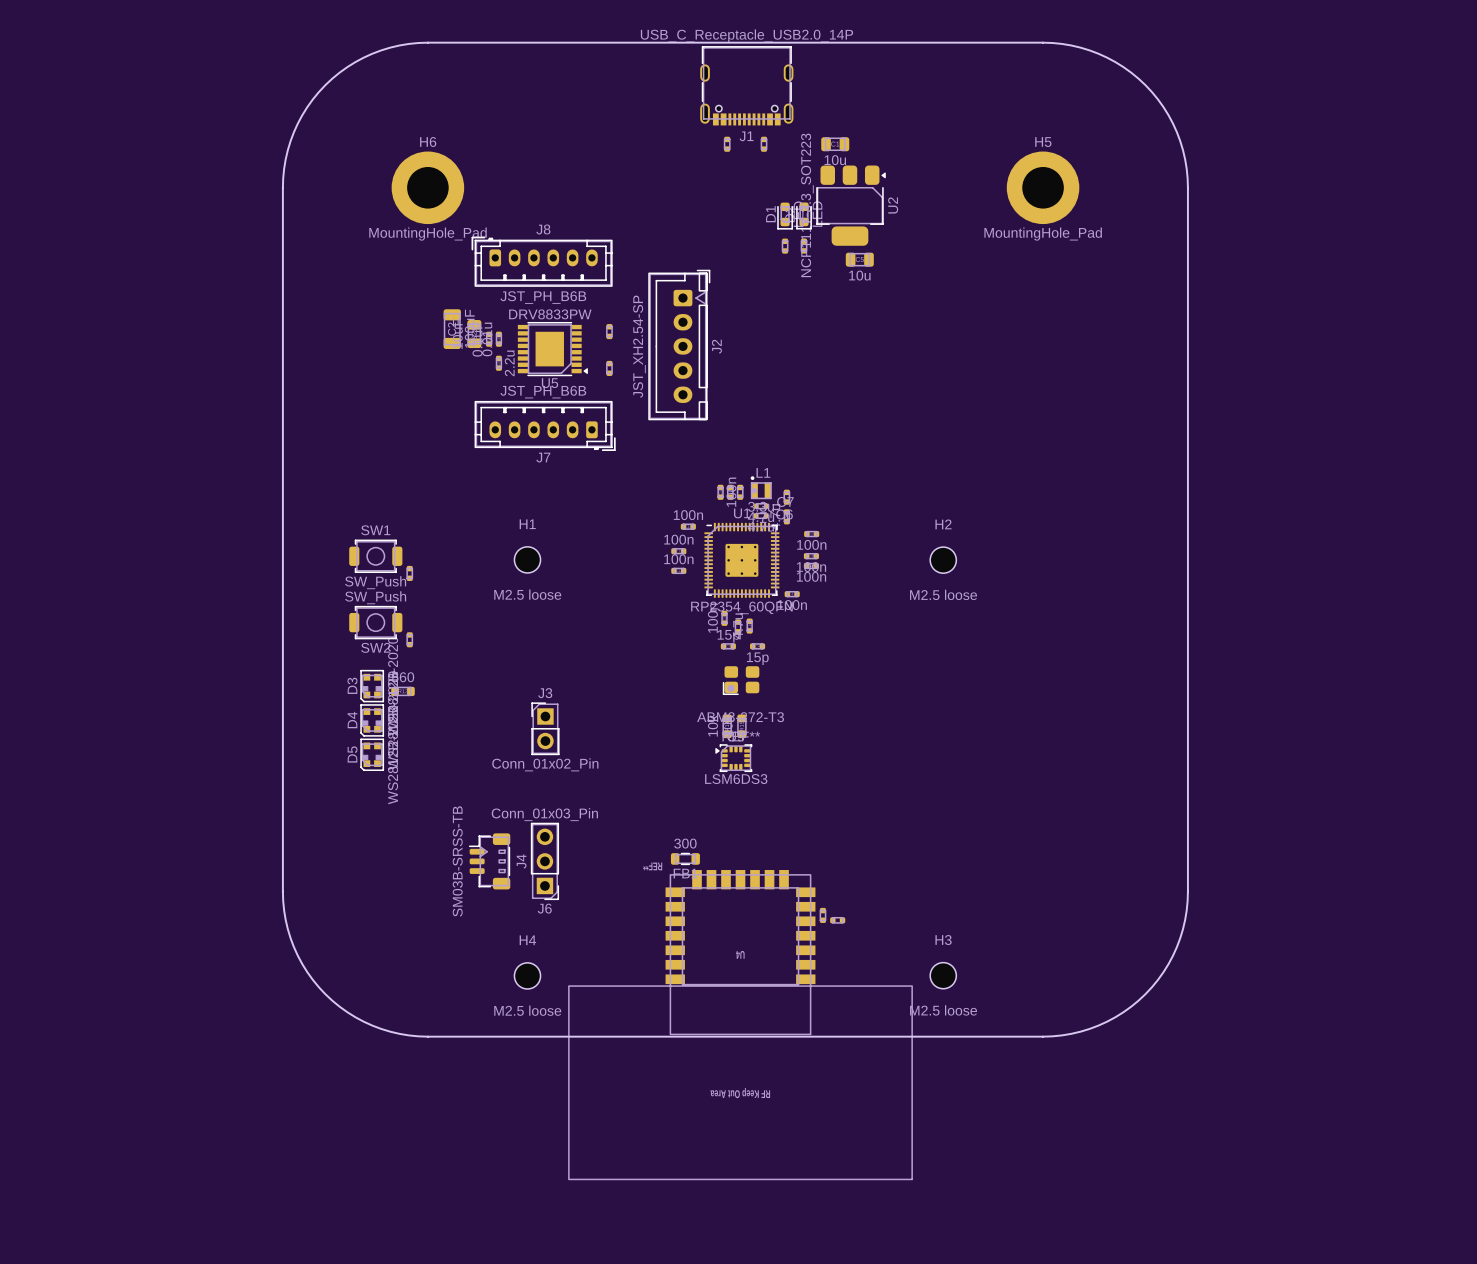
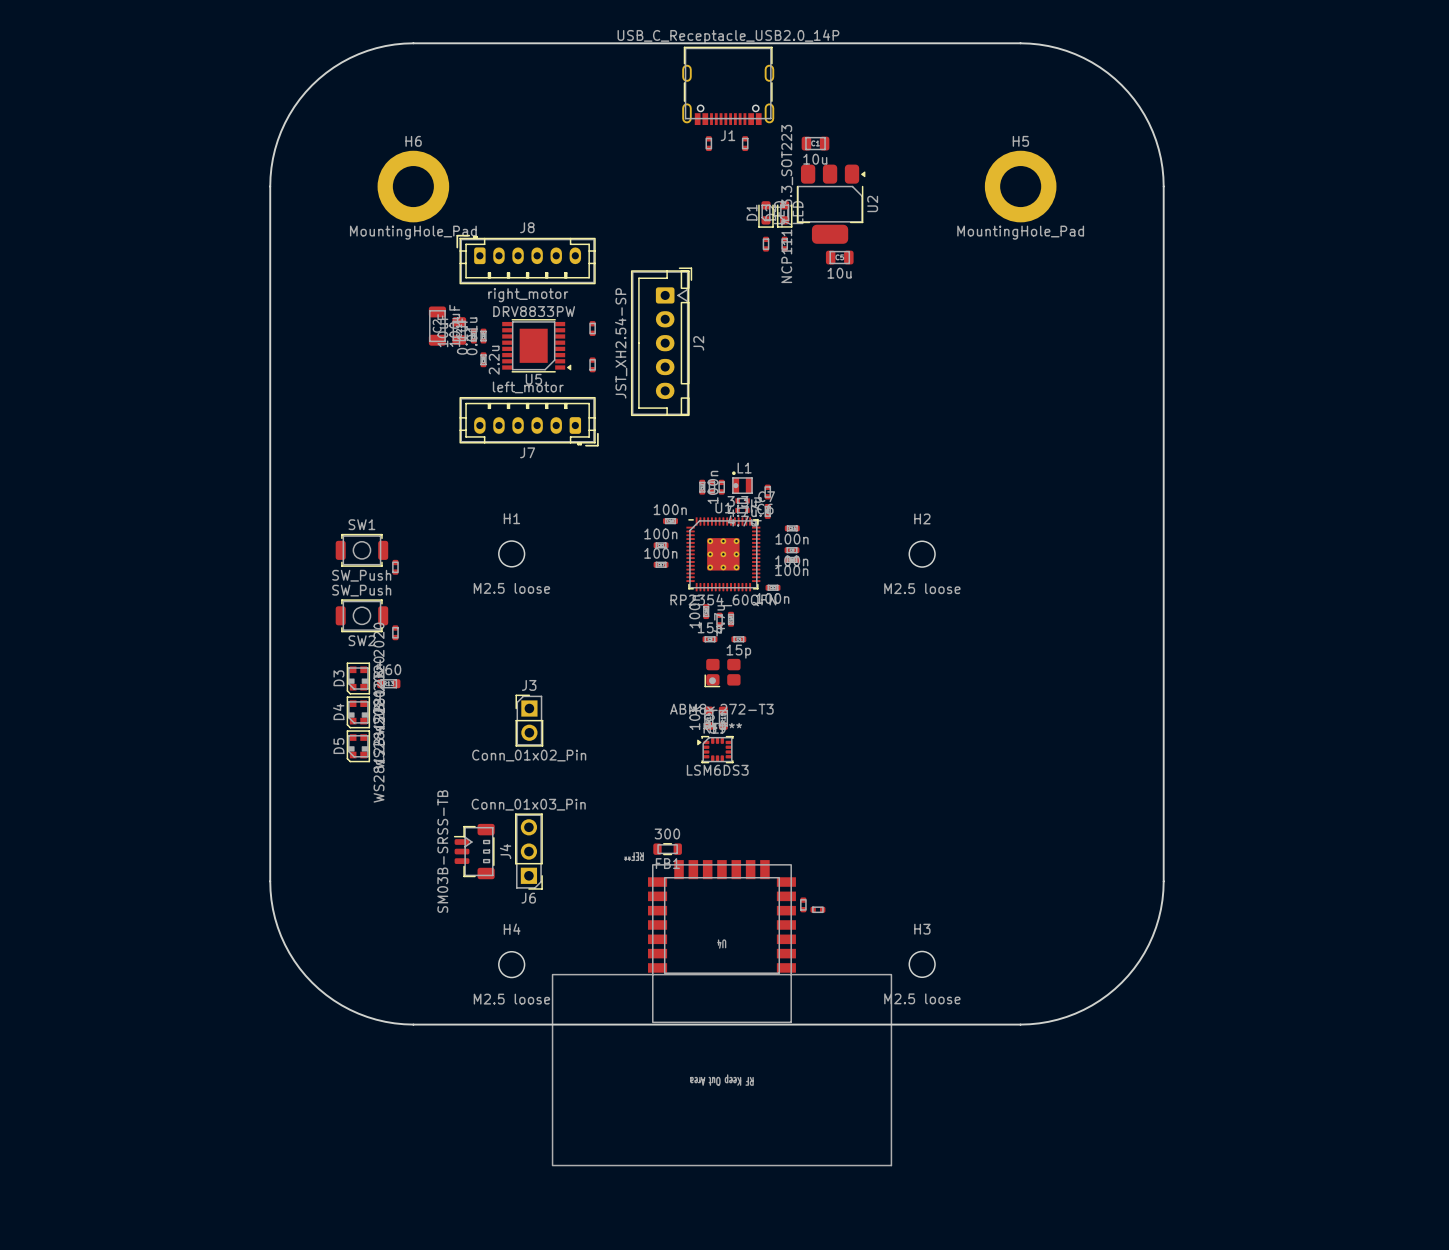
J8 value: JST_PH_B6B (543, 297) -> right_motor (528, 295)
J7 value: JST_PH_B6B (543, 392) -> left_motor (528, 387)

